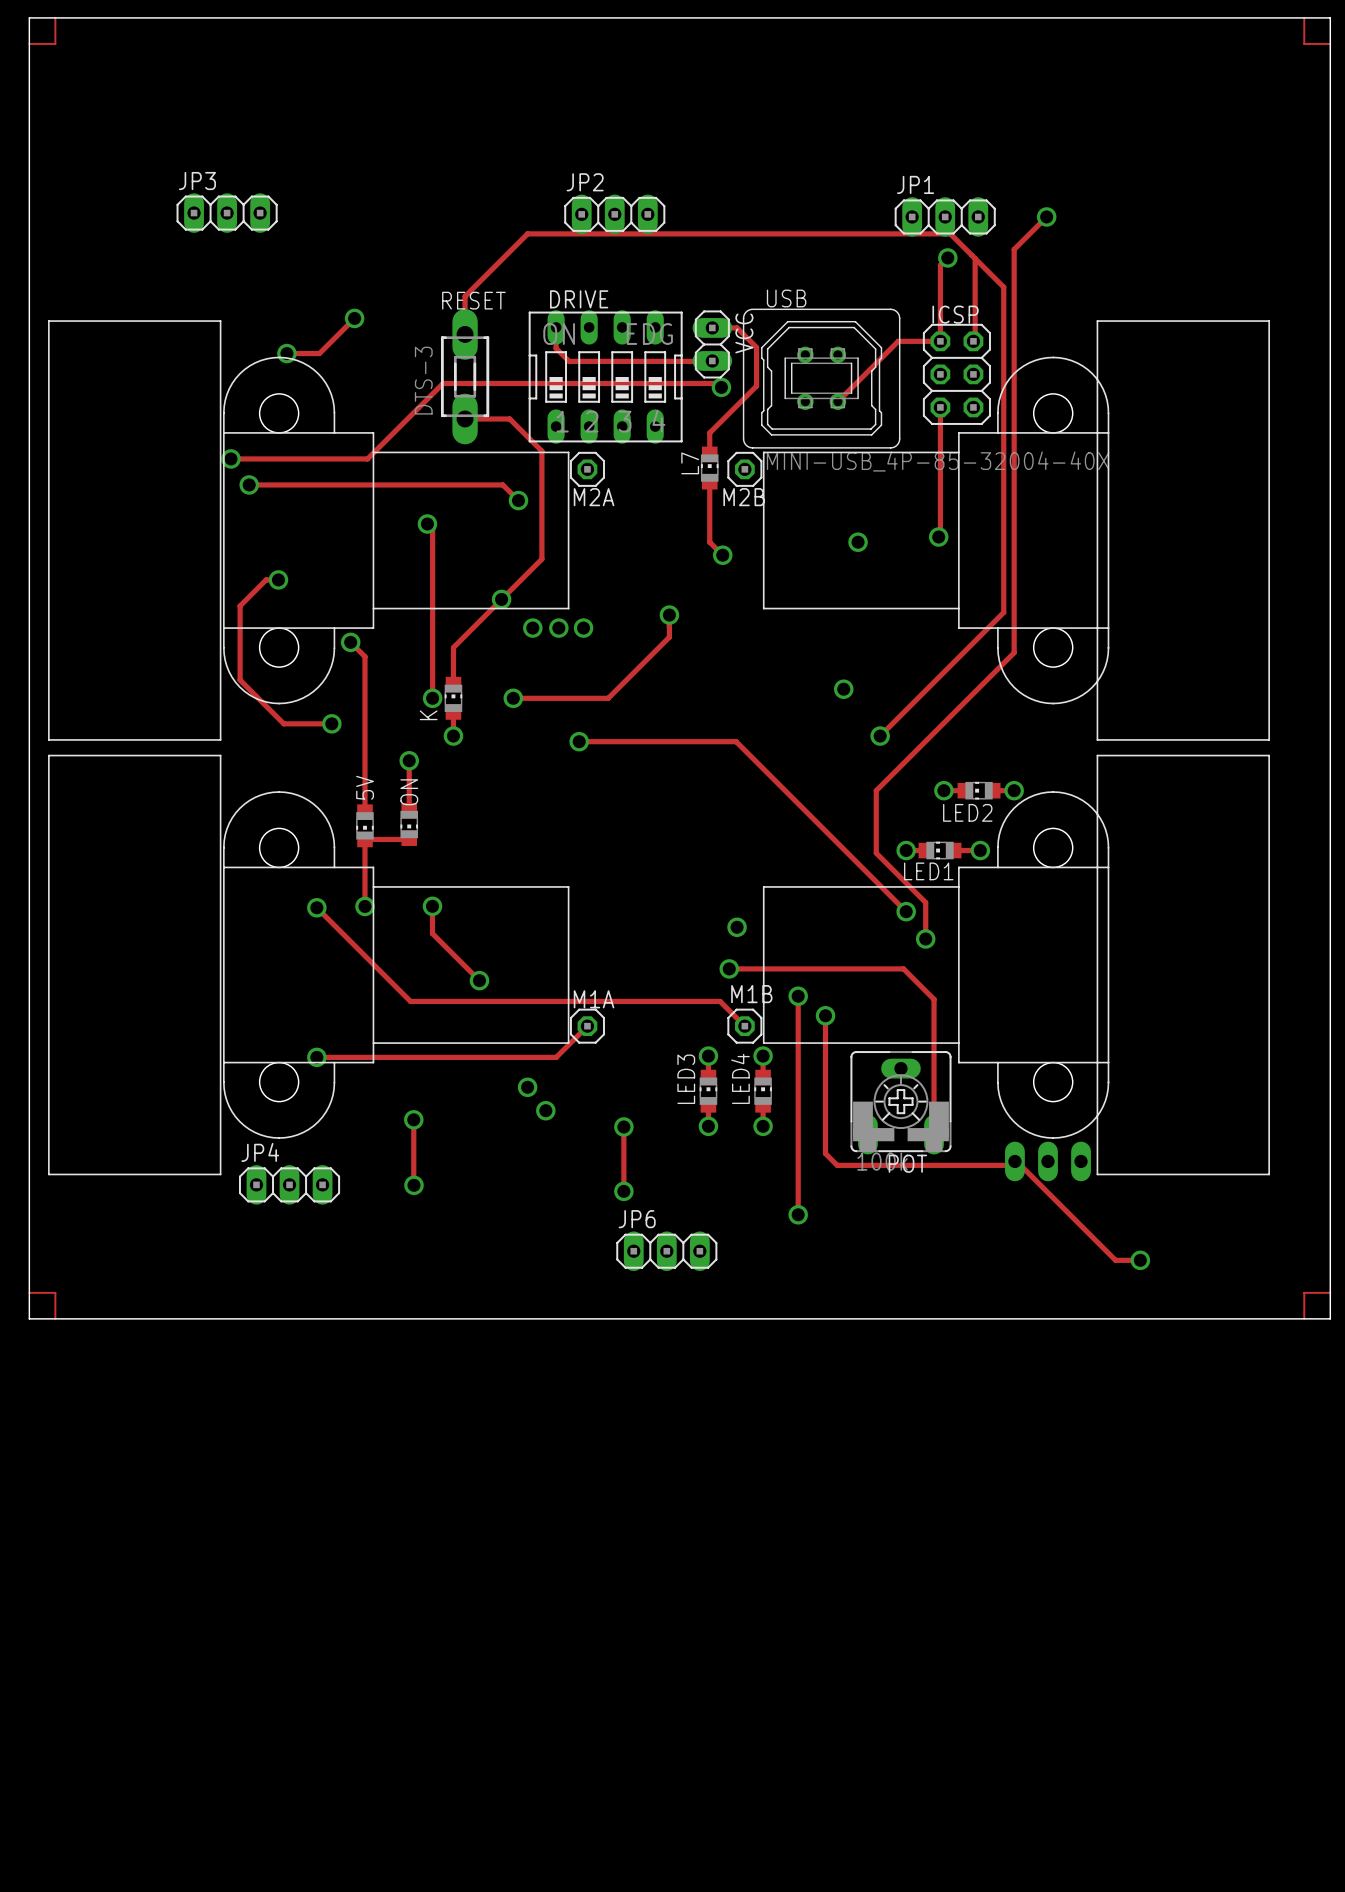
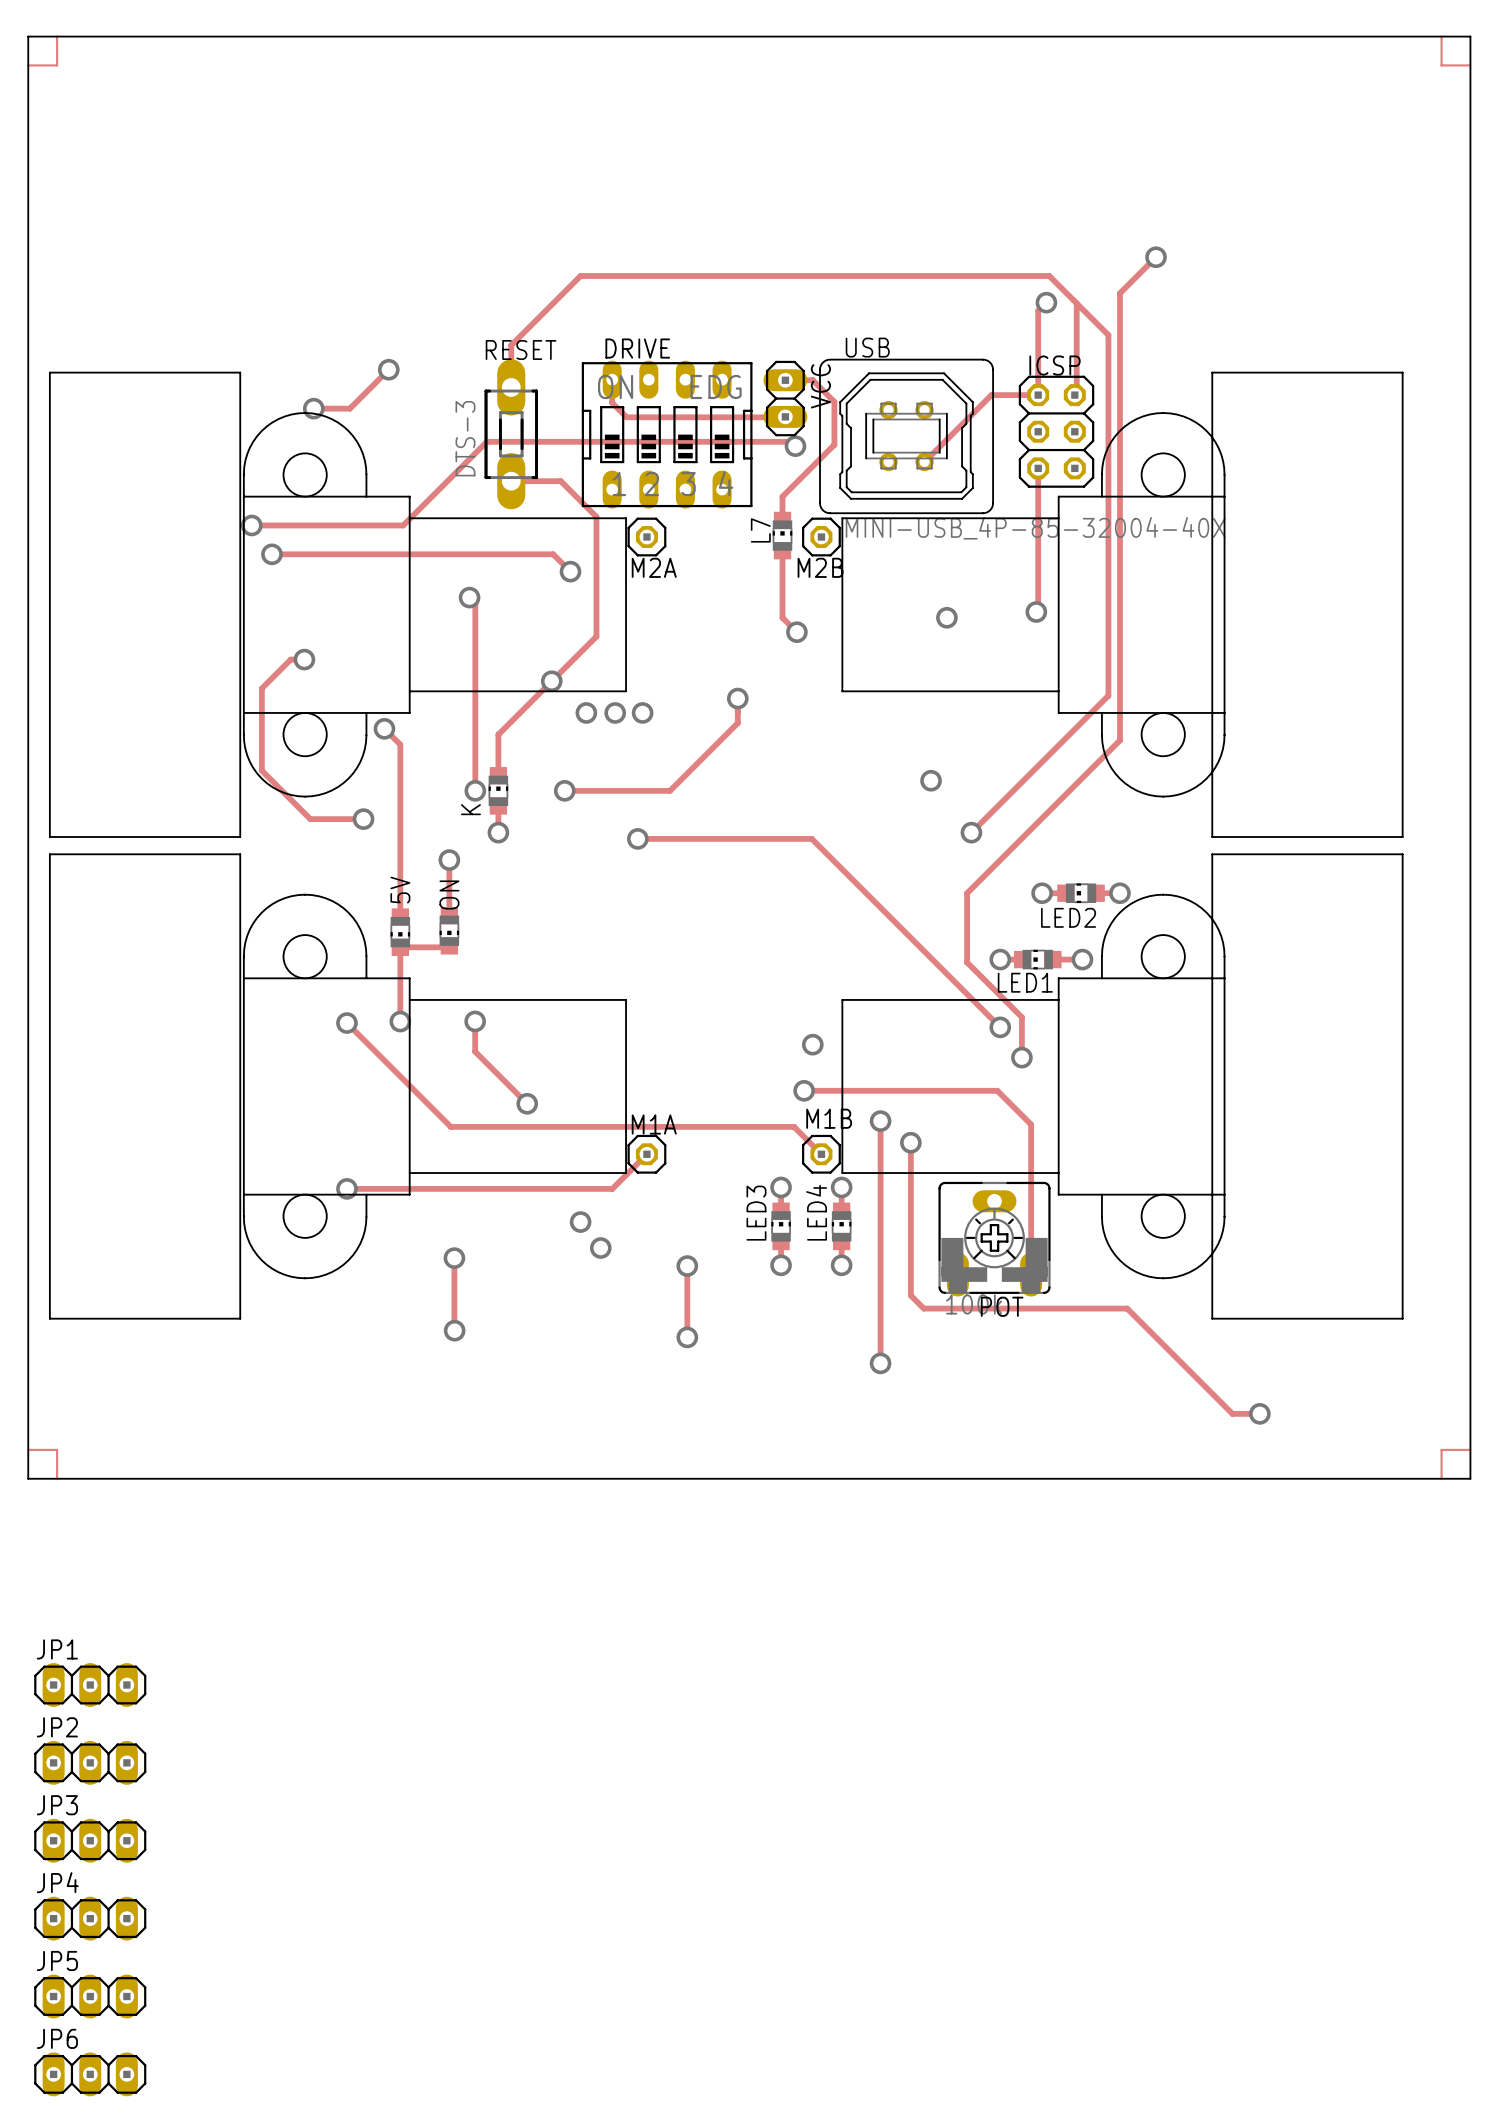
JP3 position: (227, 213) -> (90, 1840)
JP2 position: (614, 214) -> (90, 1762)
JP1 position: (945, 216) -> (90, 1684)
part: (1047, 1161) -> none
JP4 position: (289, 1184) -> (90, 1918)
JP6 position: (666, 1251) -> (90, 2074)
JP5: none -> (90, 1996)

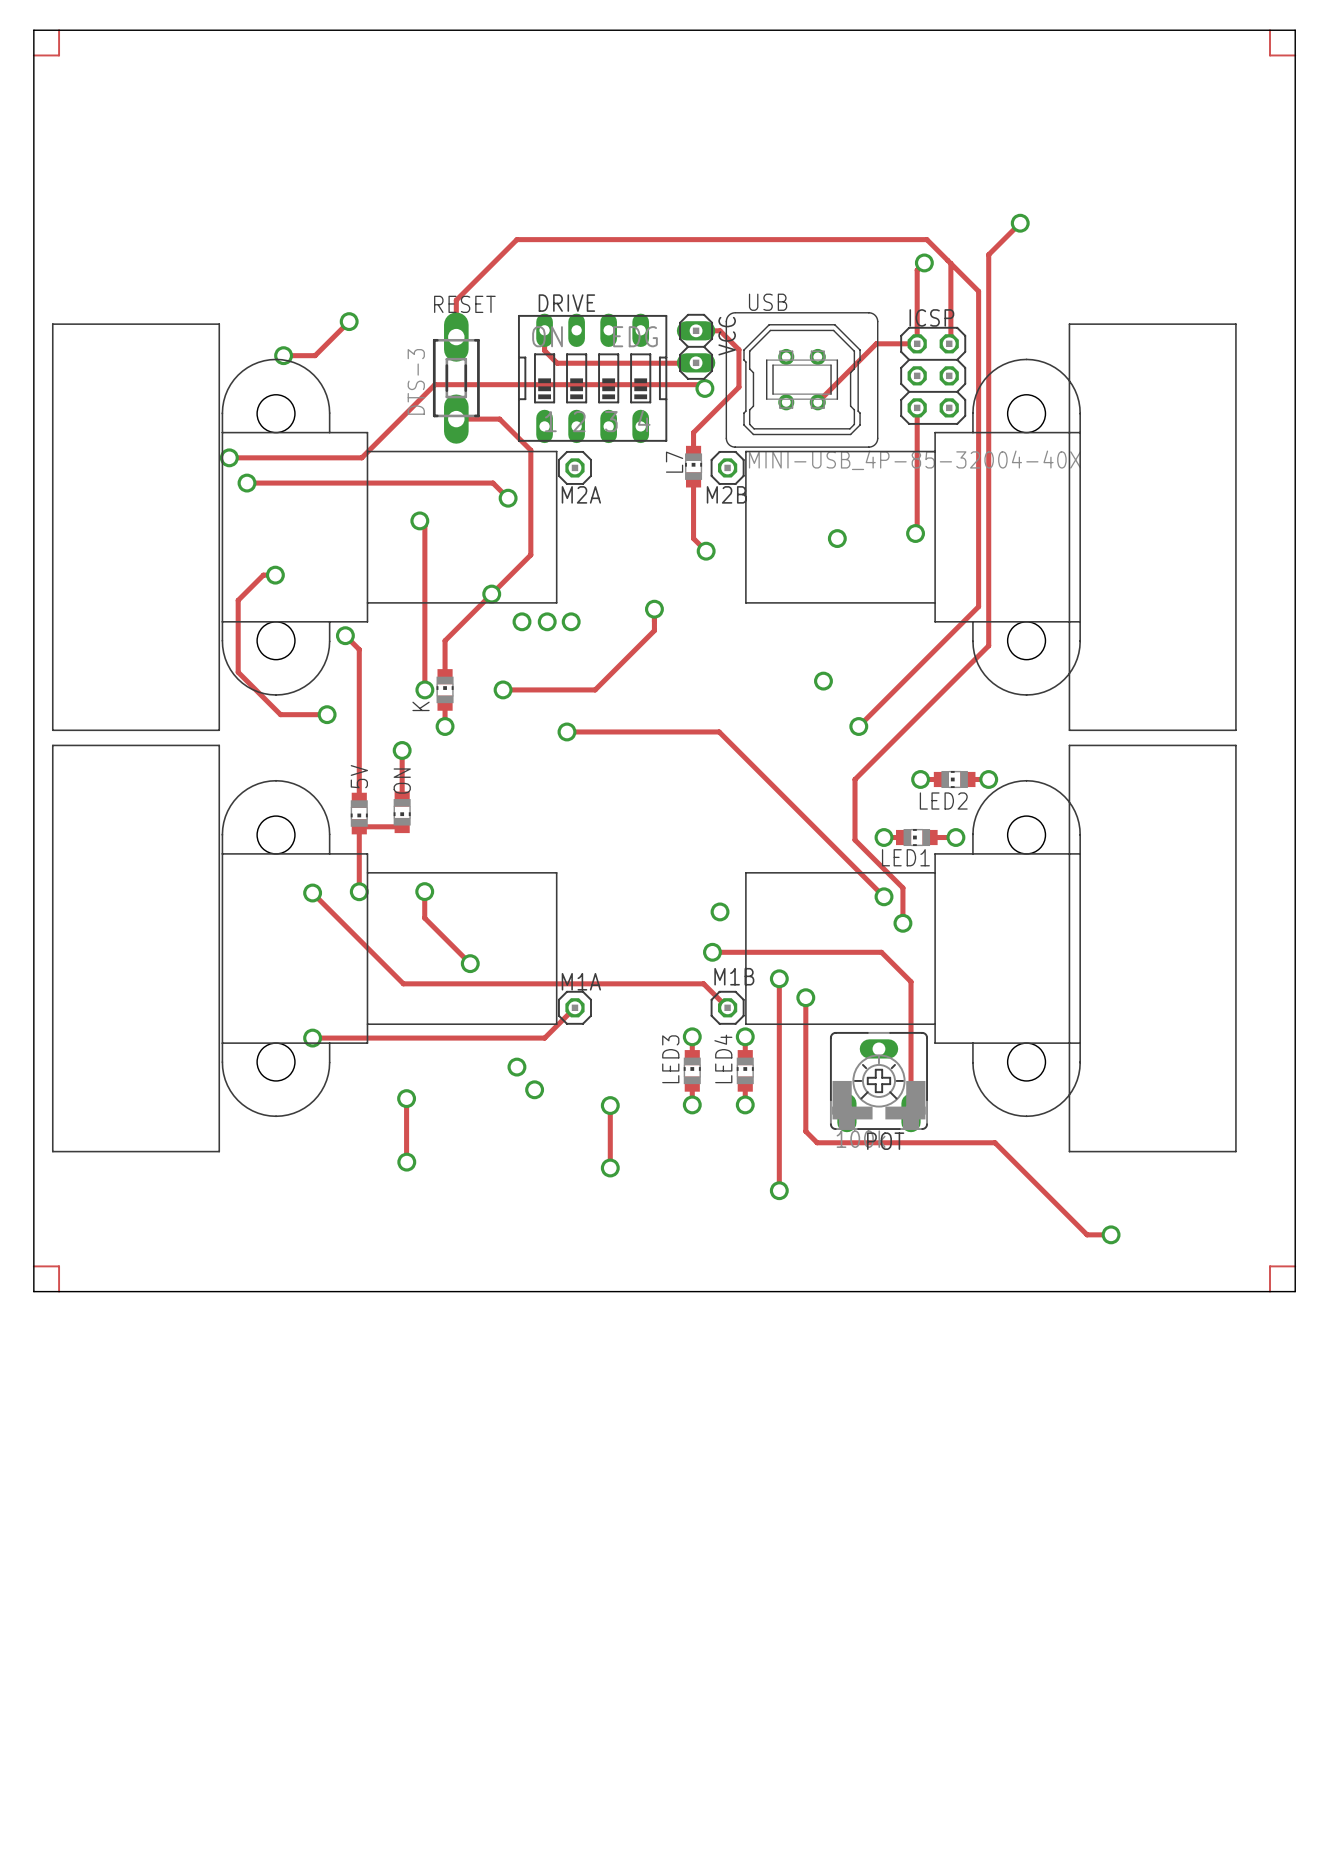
JP1: (90, 1684) -> none
JP2: (90, 1762) -> none
JP3: (90, 1840) -> none
JP4: (90, 1918) -> none
JP5: (90, 1996) -> none
JP6: (90, 2074) -> none

